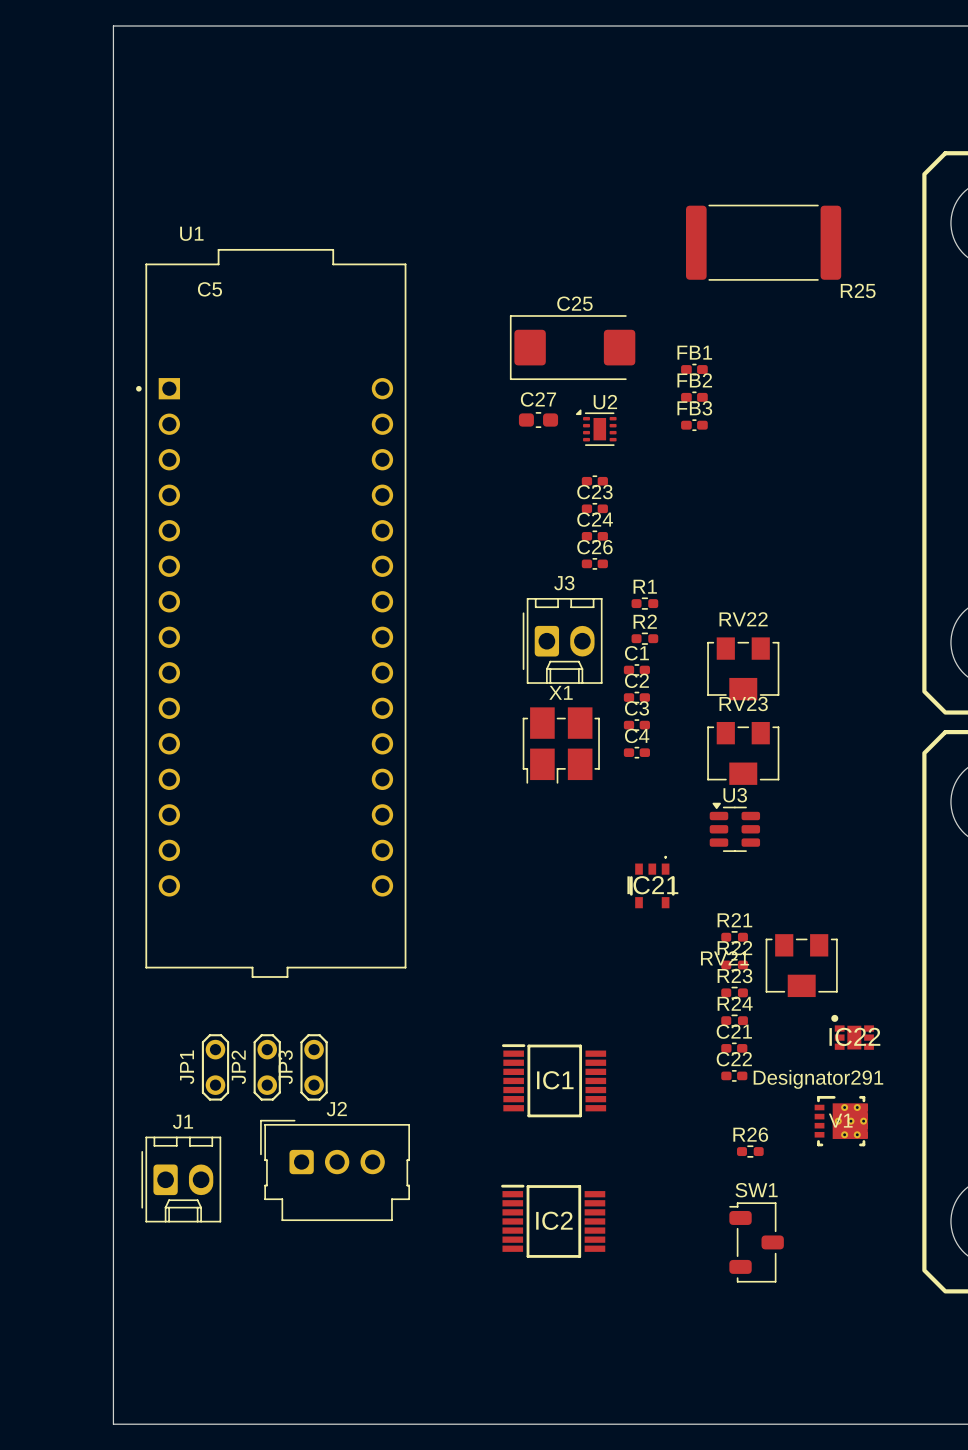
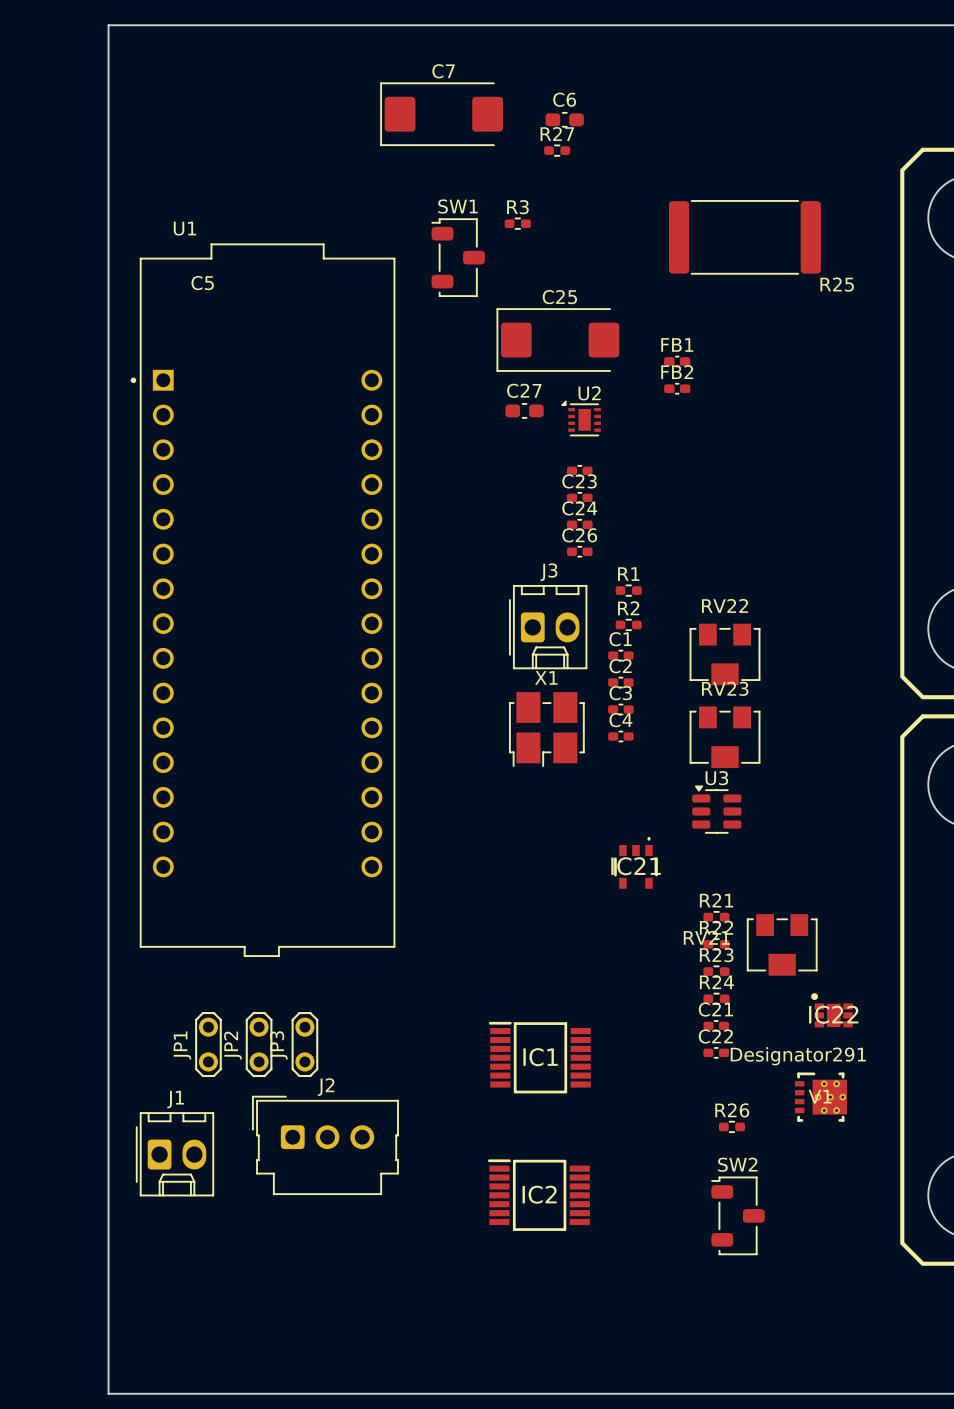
C7: none -> (441, 114)
C6: none -> (564, 119)
R27: none -> (557, 150)
R3: none -> (517, 223)
SW1: none -> (458, 257)
FB3: (694, 425) -> none
SW1 name: SW1 (756, 1190) -> SW2 (737, 1164)

